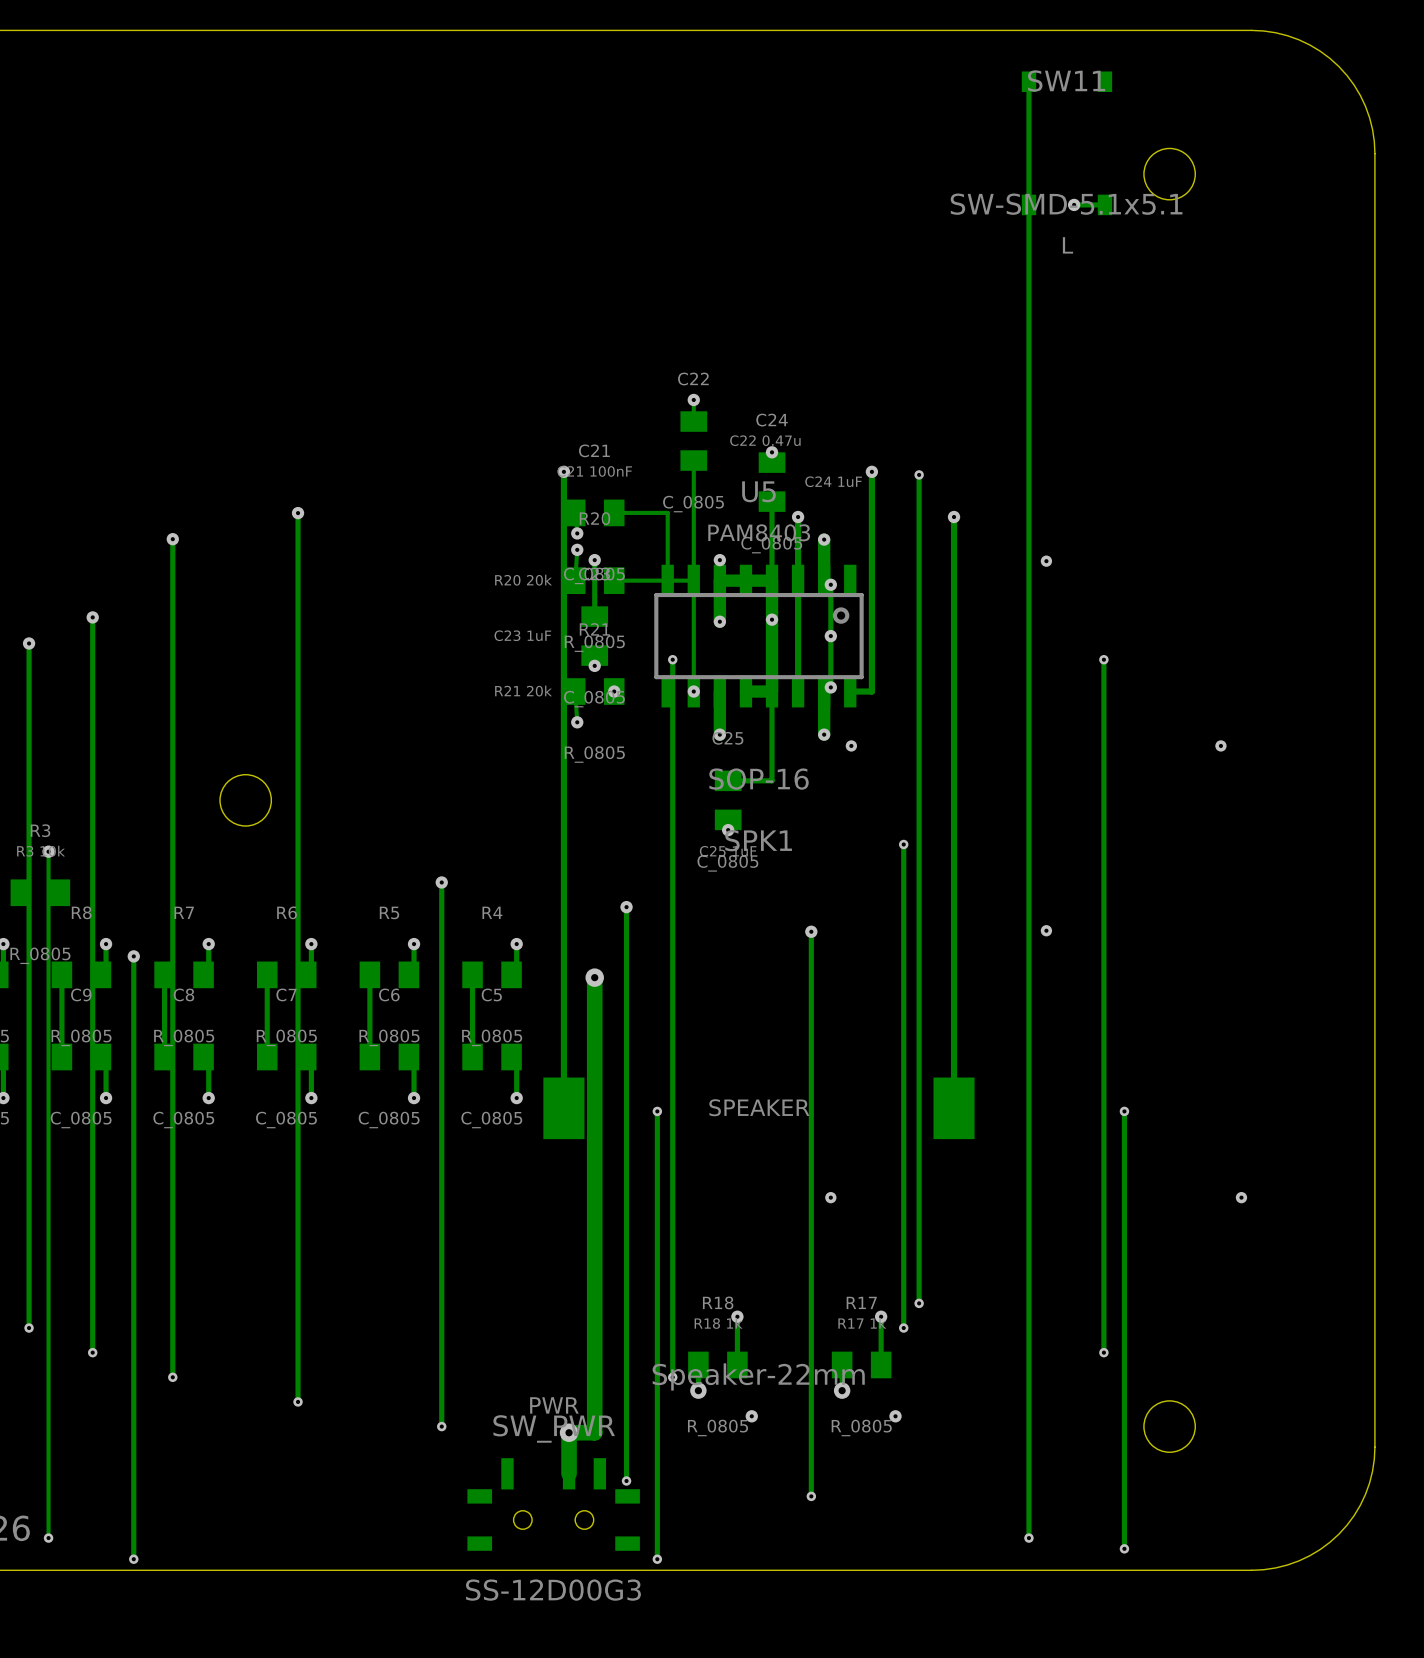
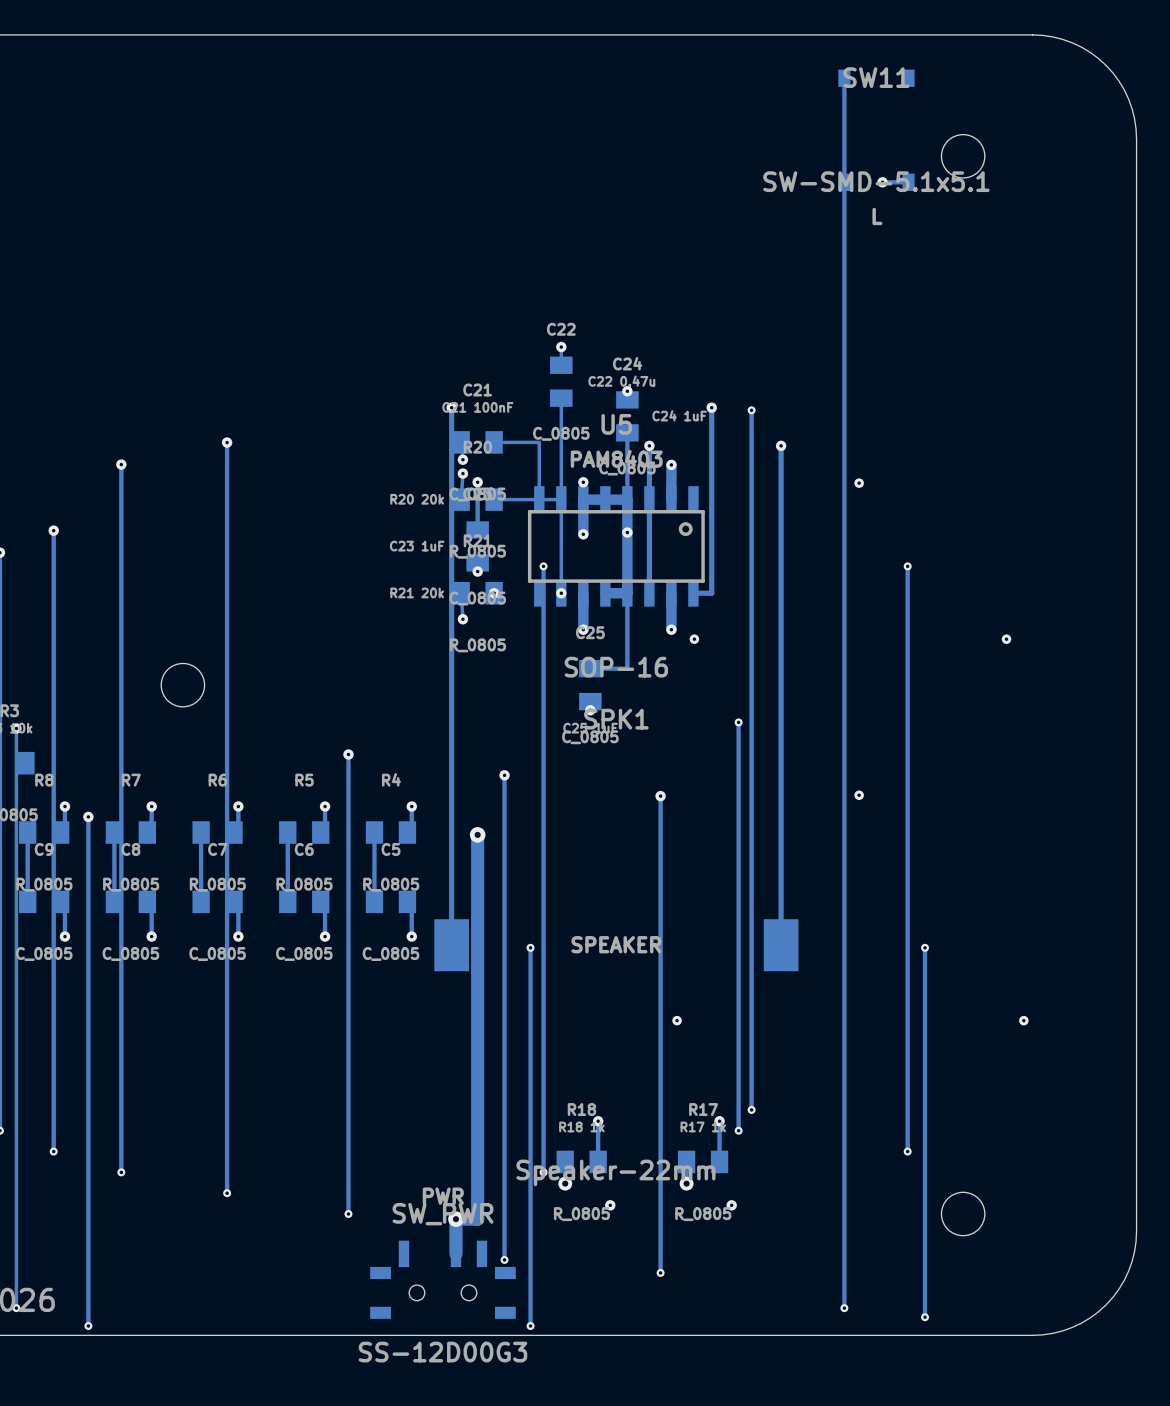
track: (830, 584) (830, 687) -> none
via: (830, 584) -> none
via: (830, 636) -> none
via: (830, 687) -> none

